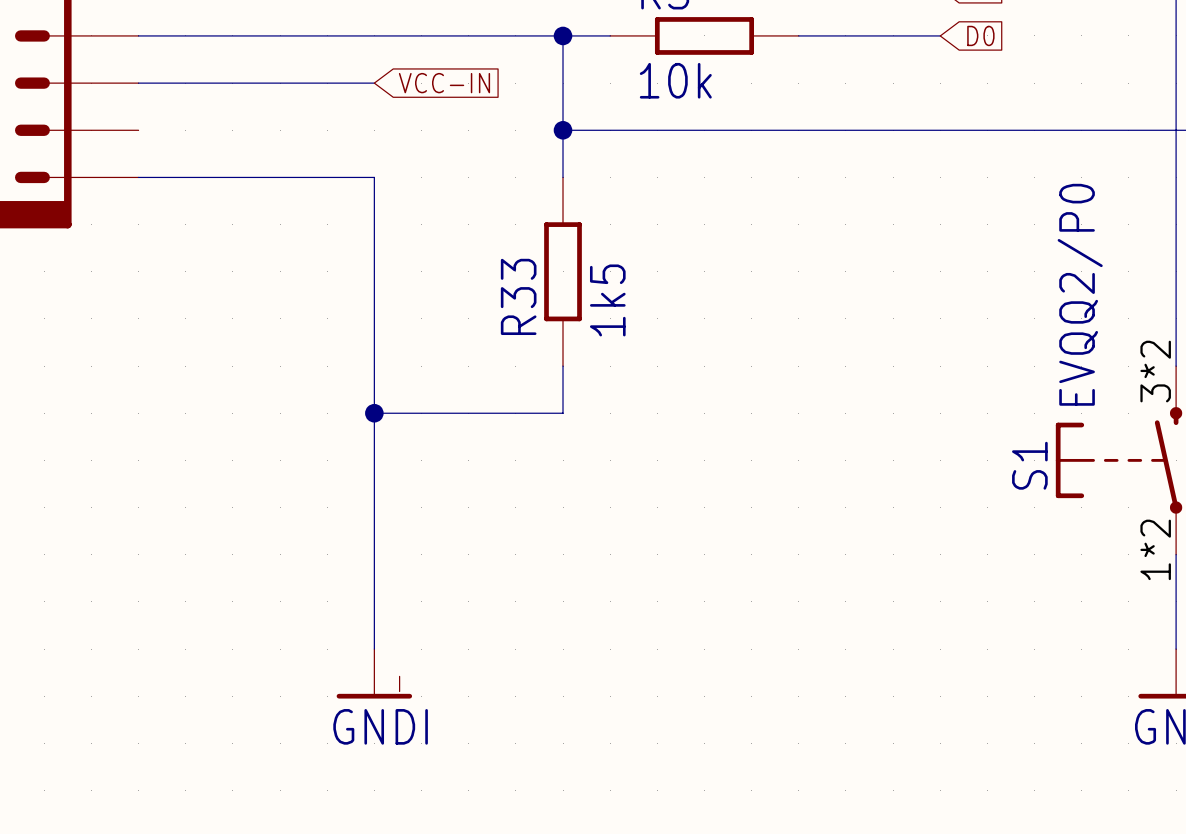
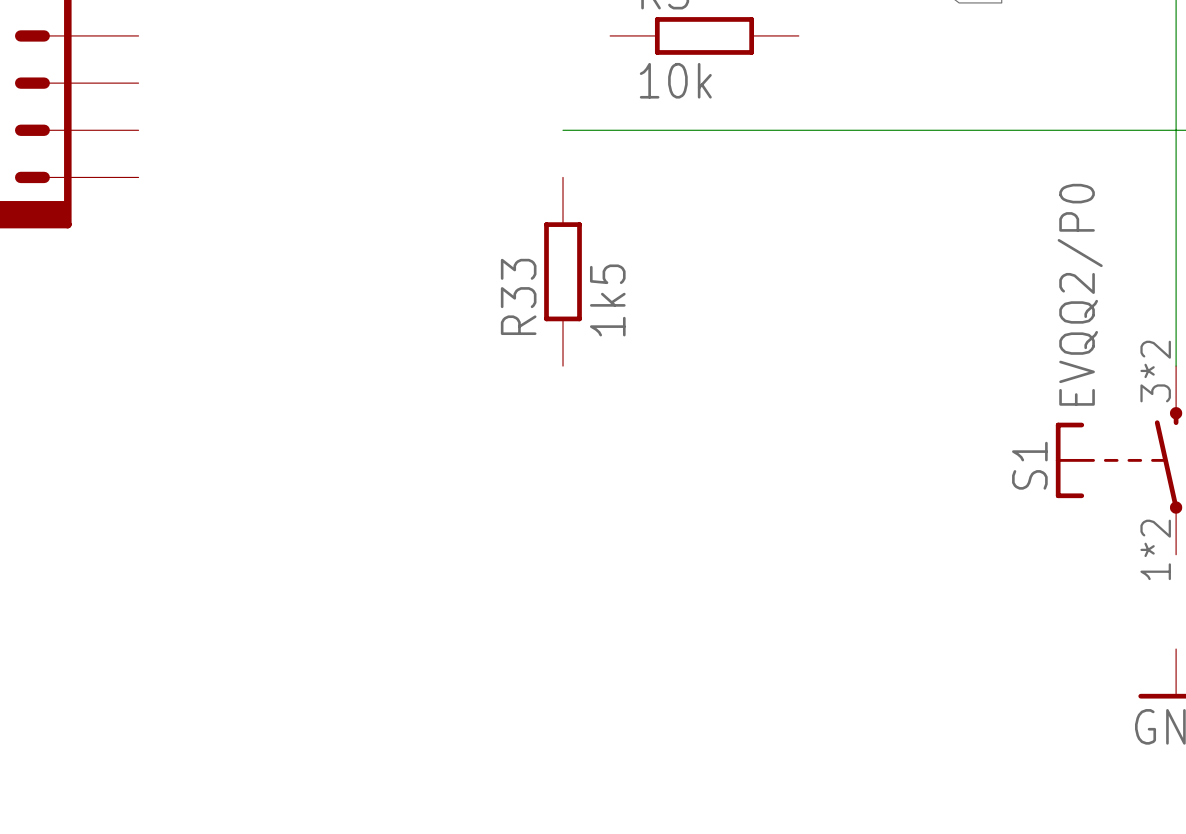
wire: (138, 35) (610, 35) -> none
wire: (563, 35) (563, 177) -> none
junction: (563, 35) -> none
wire: (798, 35) (940, 35) -> none
global label: D0 (980, 35) -> none
wire: (138, 83) (374, 83) -> none
global label: VCC-IN (444, 83) -> none
junction: (563, 130) -> none
wire: (138, 177) (374, 177) (374, 649) -> none
wire: (563, 366) (563, 413) (374, 413) -> none
junction: (374, 413) -> none
wire: (1176, 554) (1176, 649) -> none
power symbol: GNDI (374, 673) -> none

